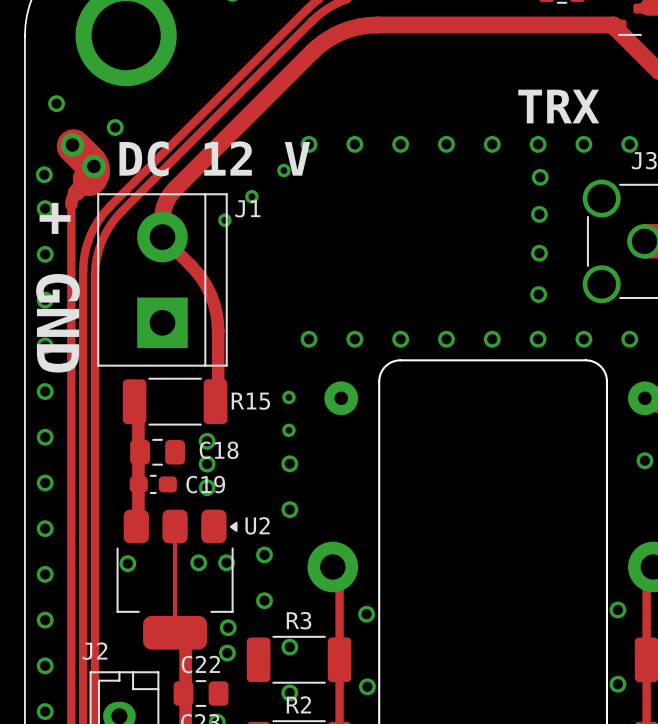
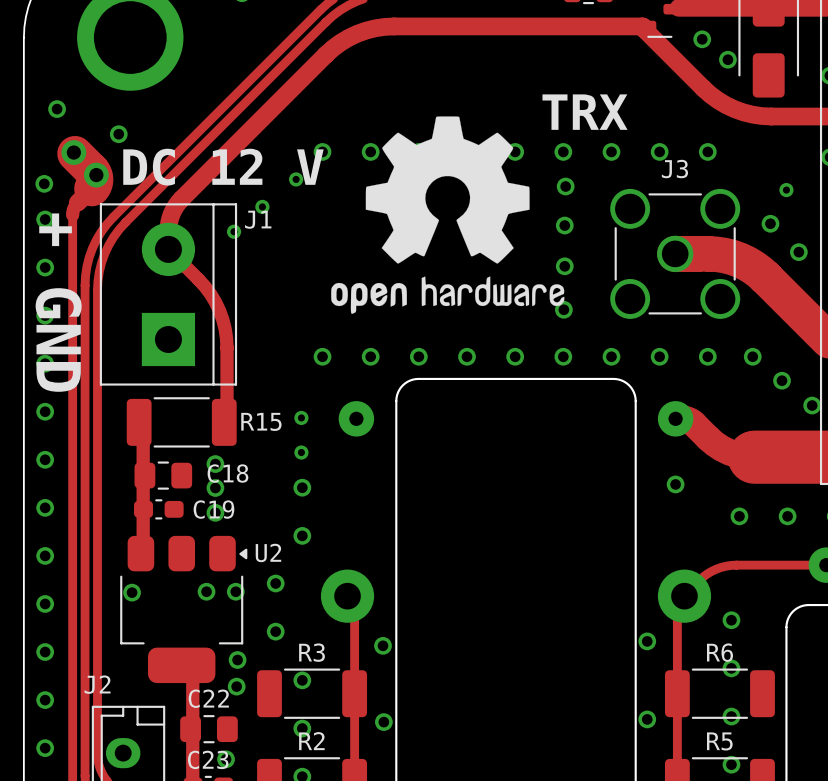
drawing: none -> [331, 116, 565, 314]
track: (175, 526) (175, 632) -> none

